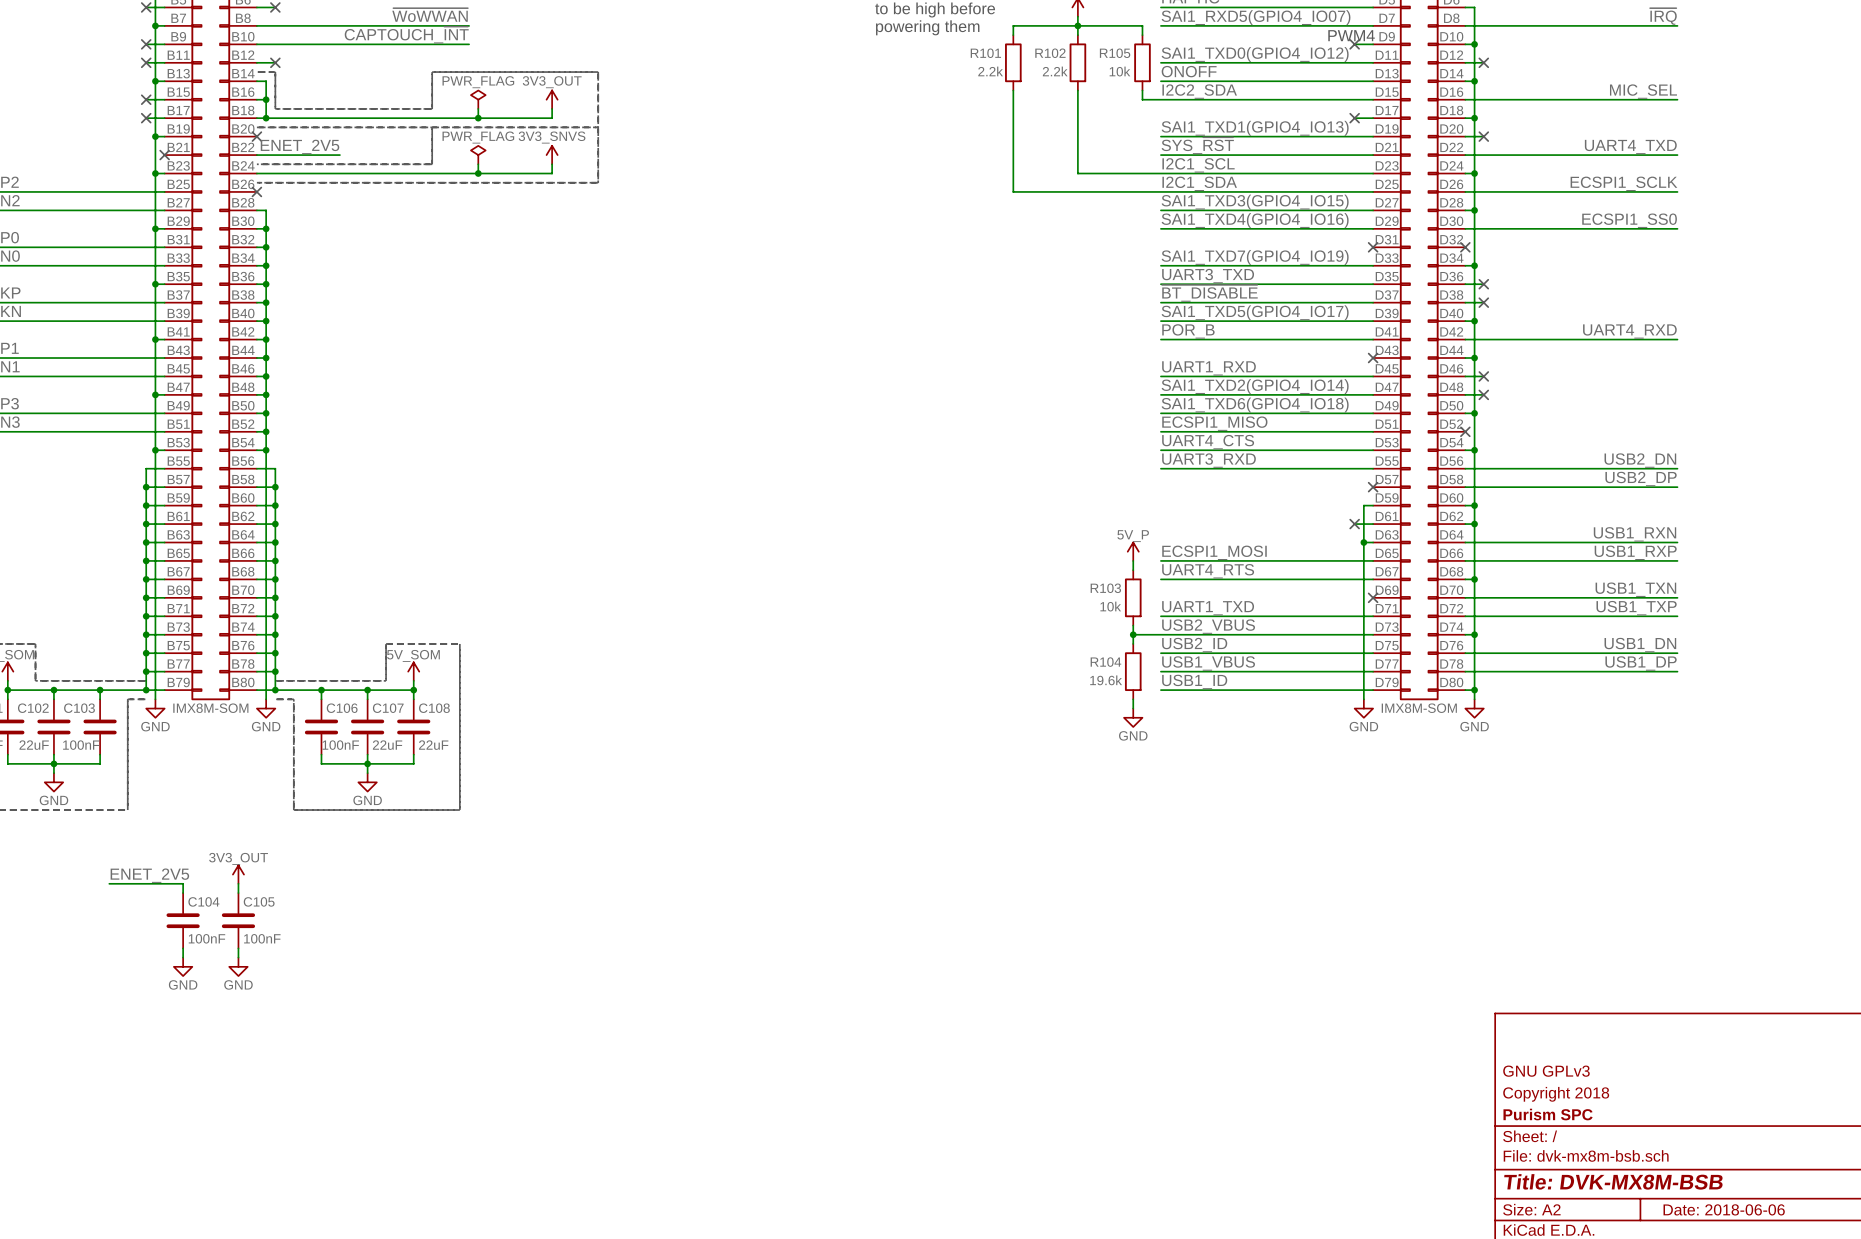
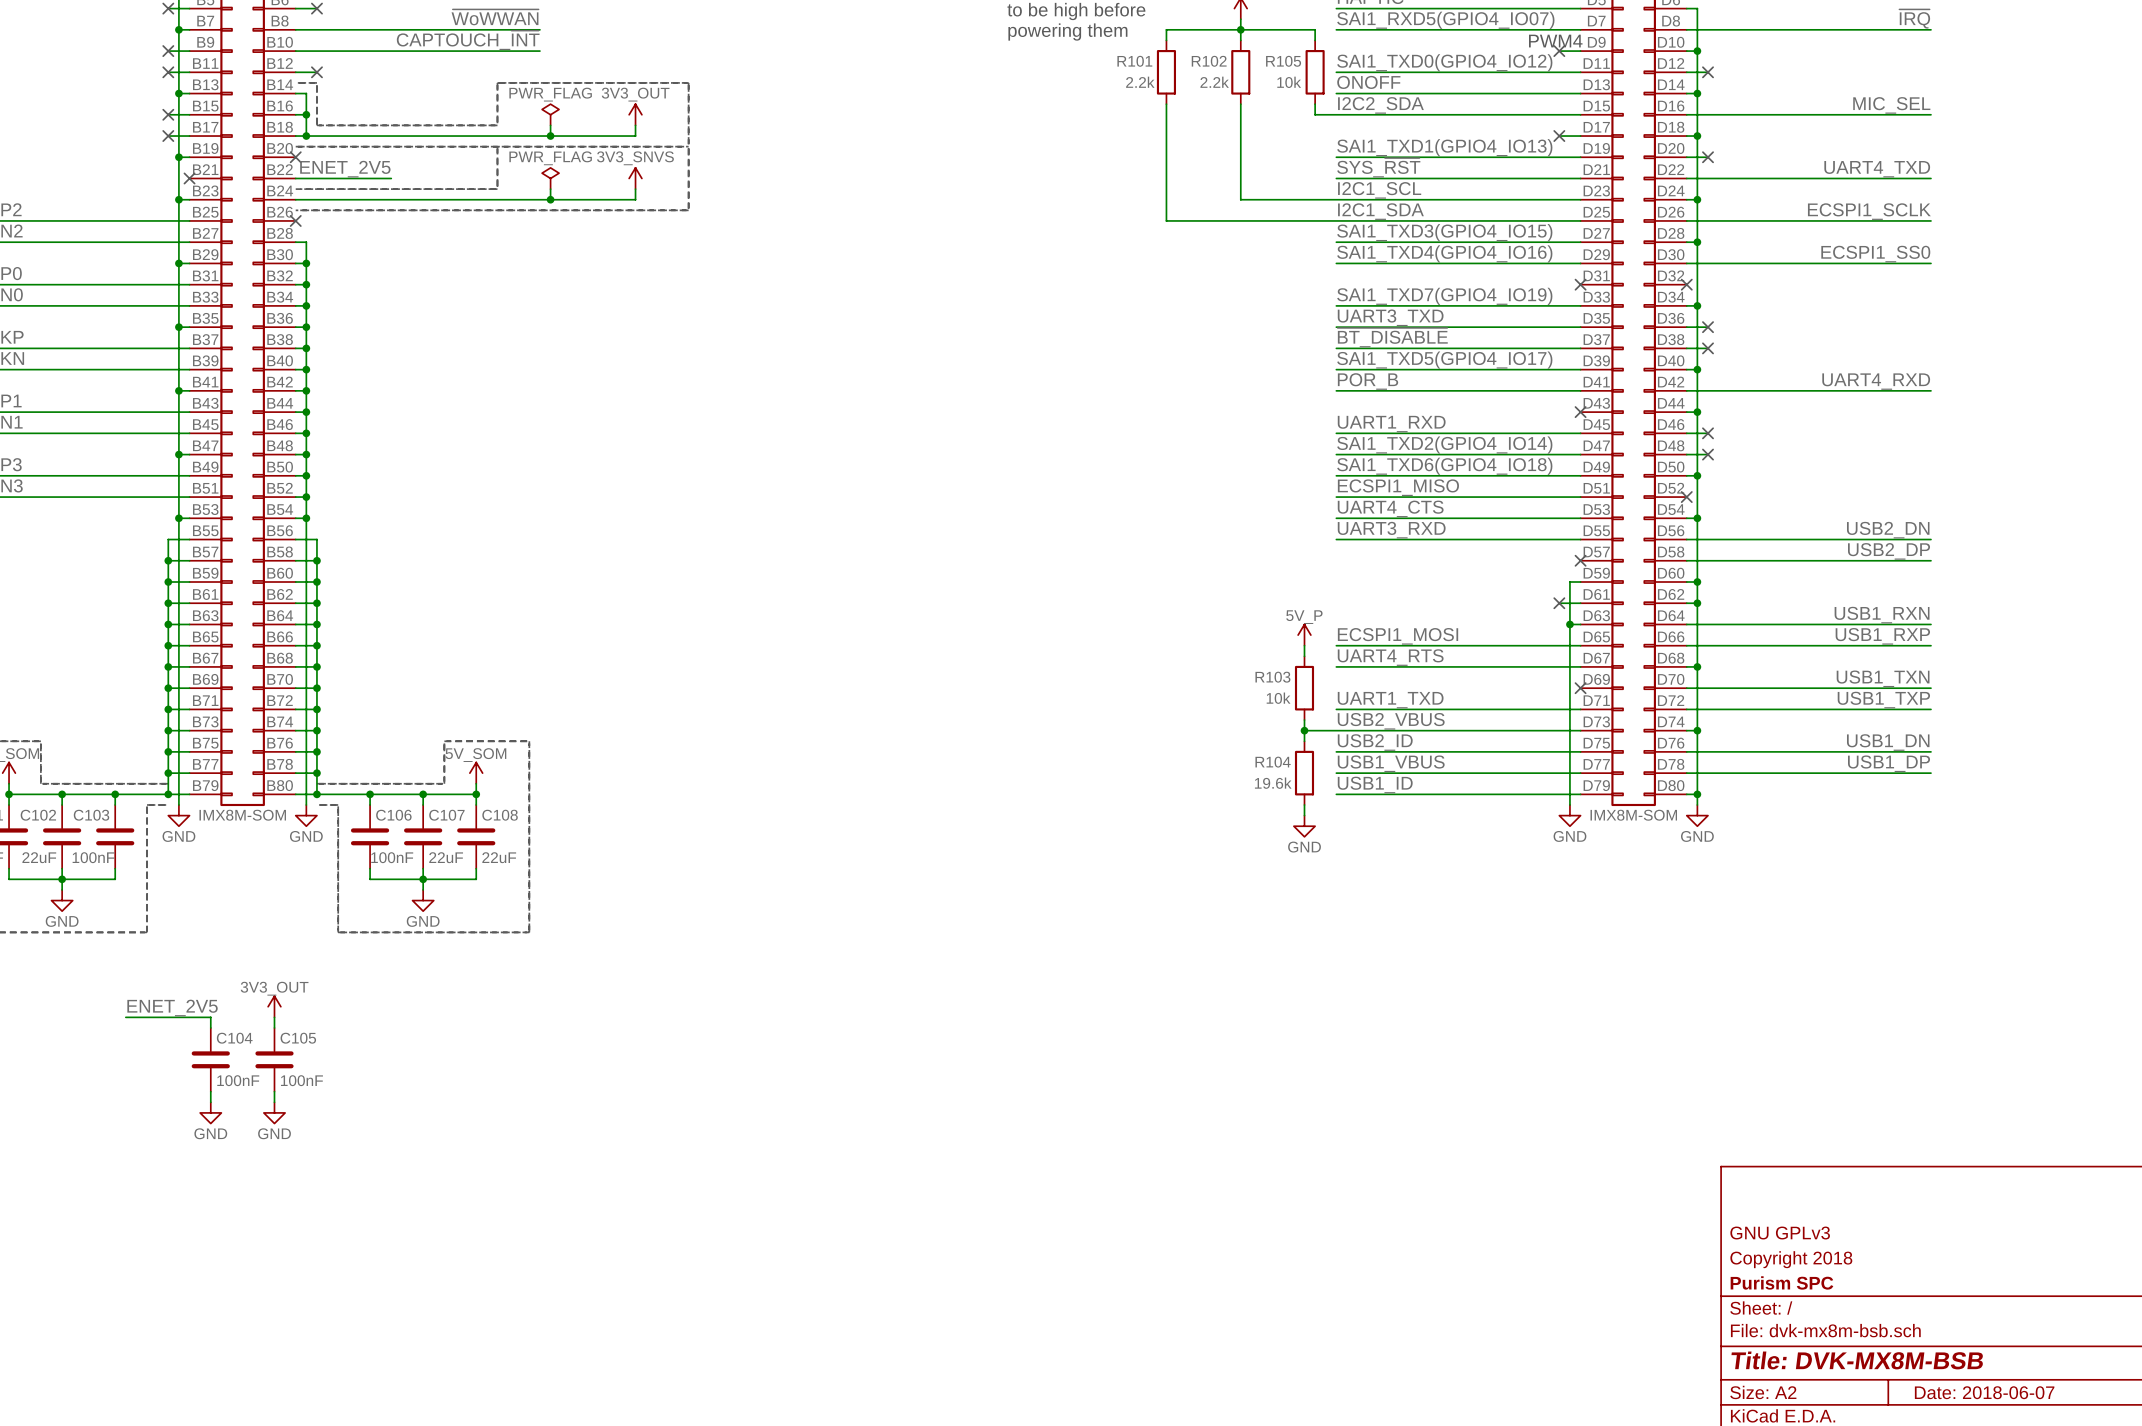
title block: Date: 2018-06-06 (1724, 1209) -> Date: 2018-06-07 (1984, 1392)

